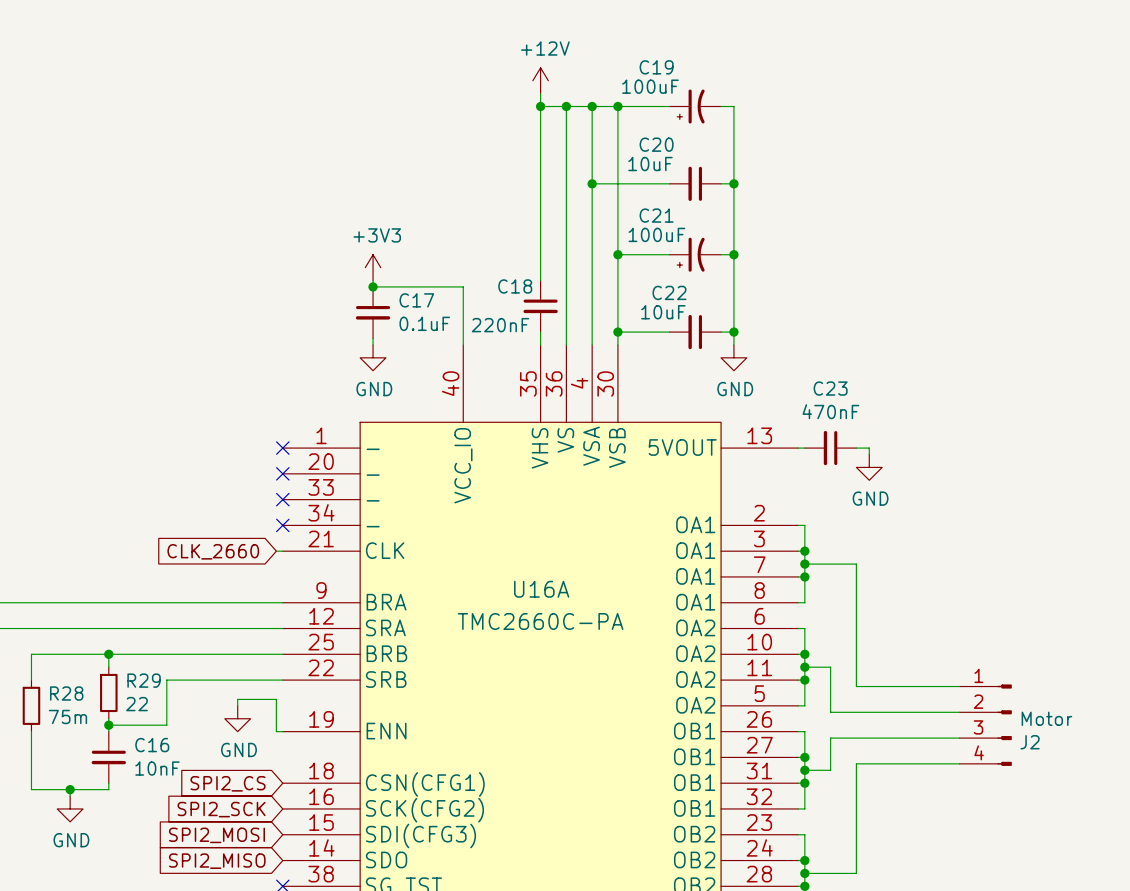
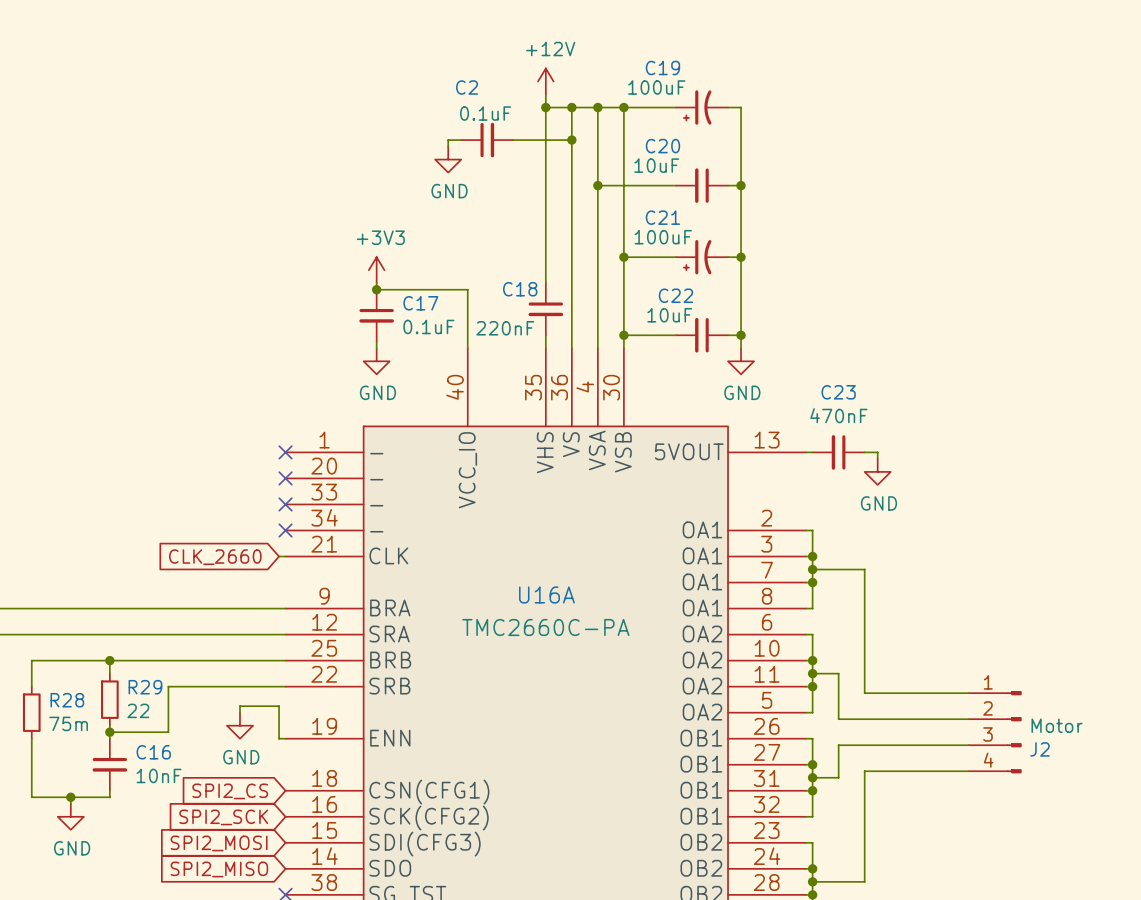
wire: none -> (461, 140) (448, 140) (448, 146)
C2: none -> 0.1uF (487, 140)
wire: none -> (513, 140) (571, 140)
junction: none -> (571, 140)
power symbol: none -> GND (448, 159)

